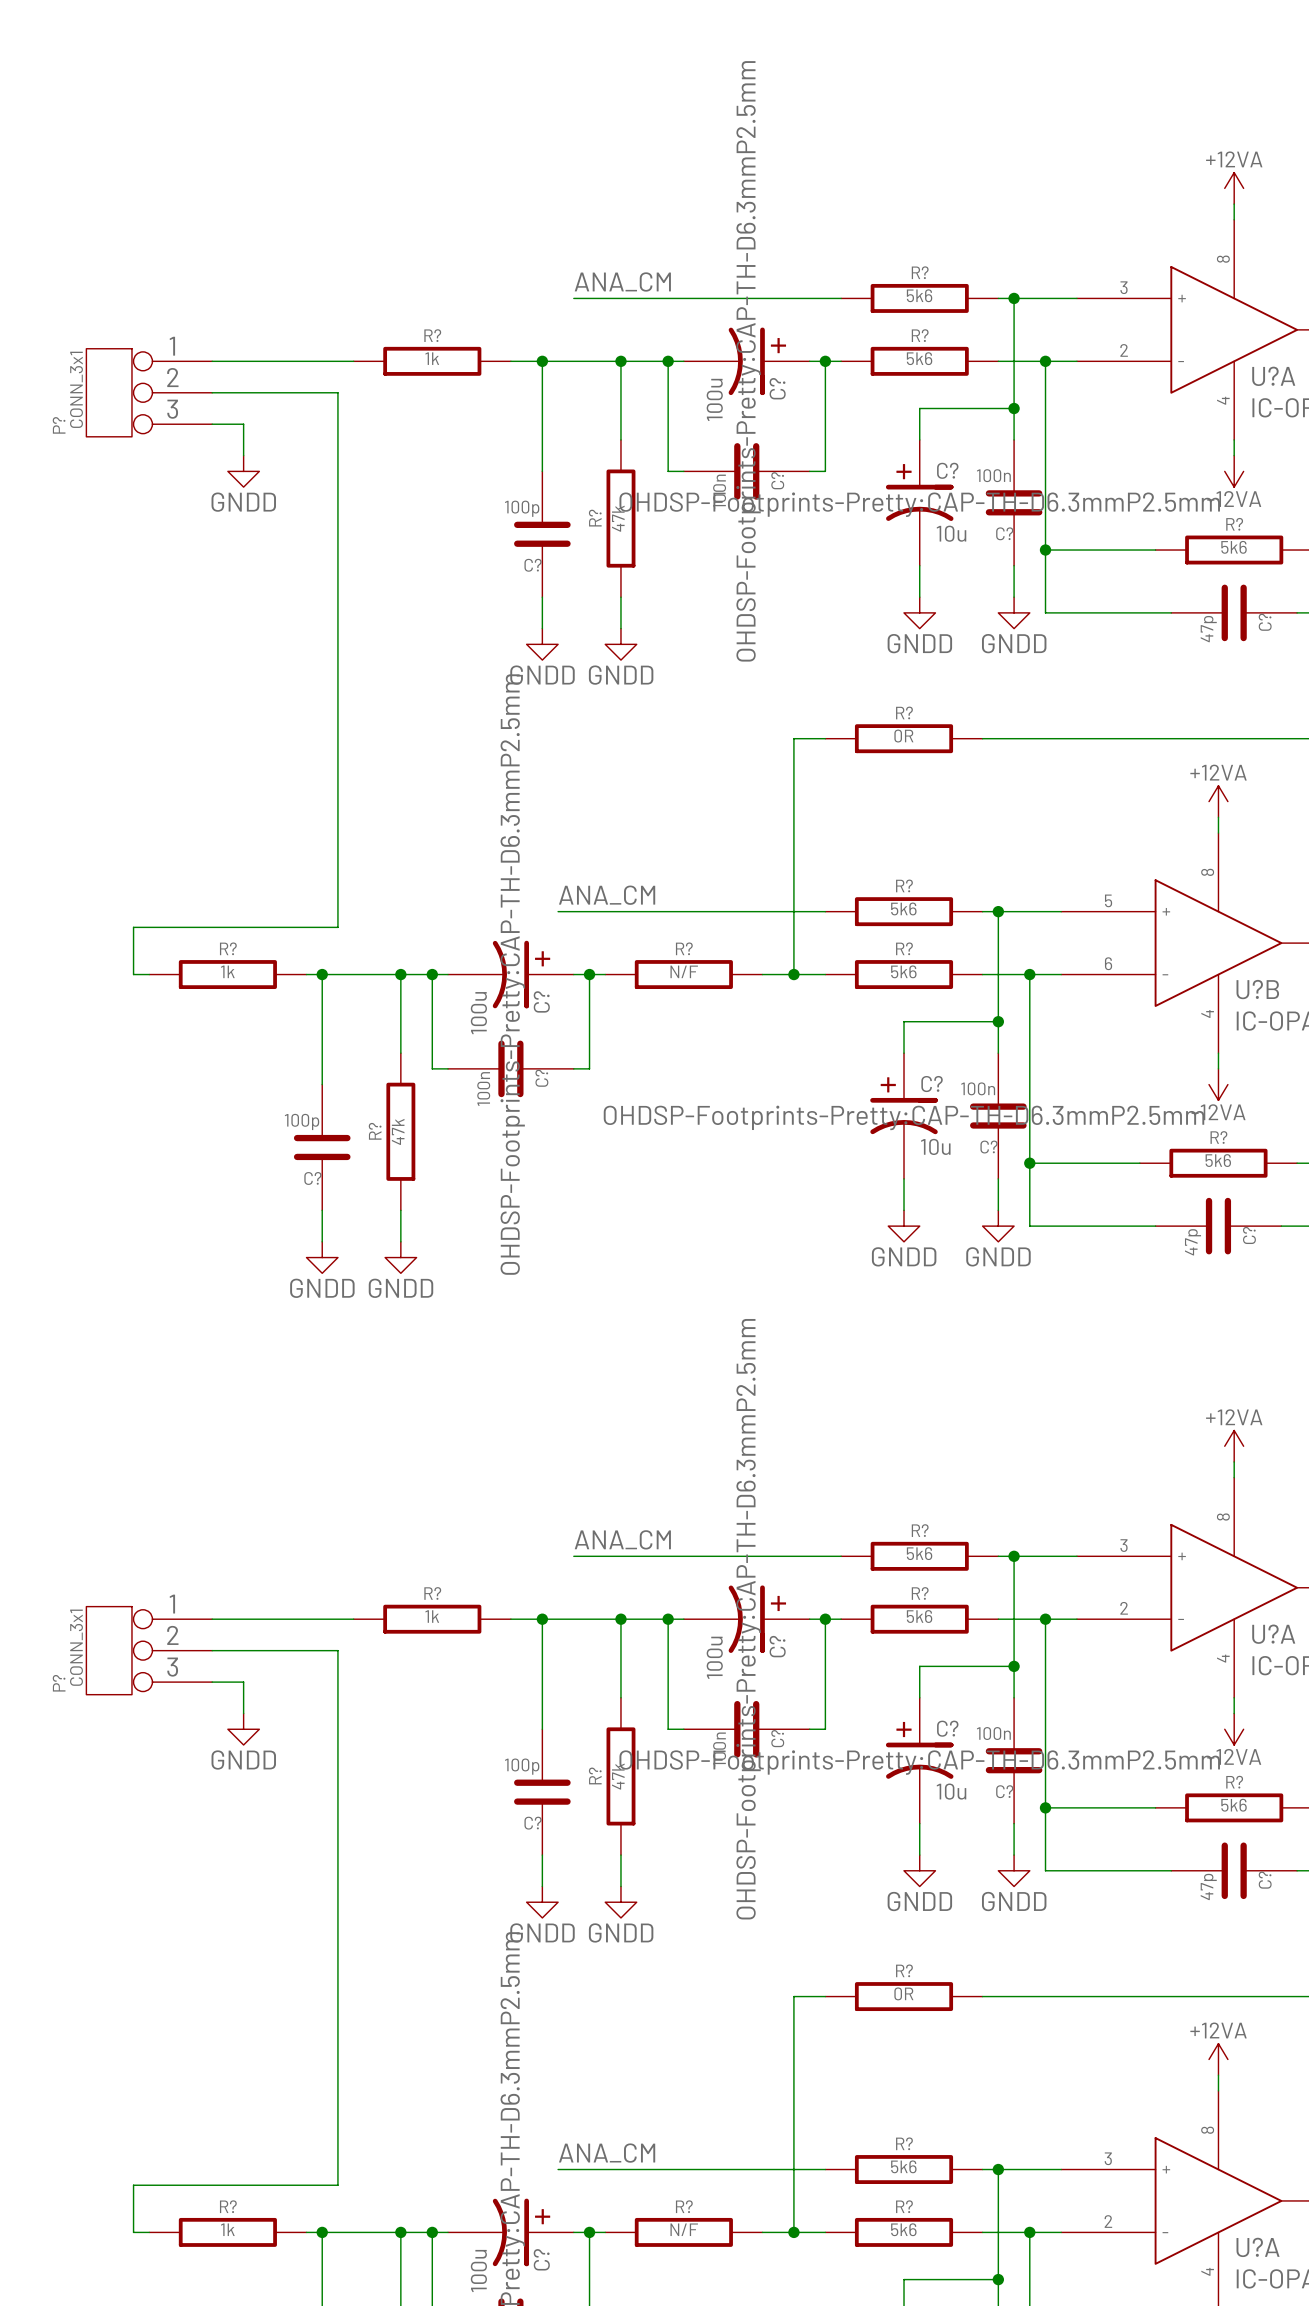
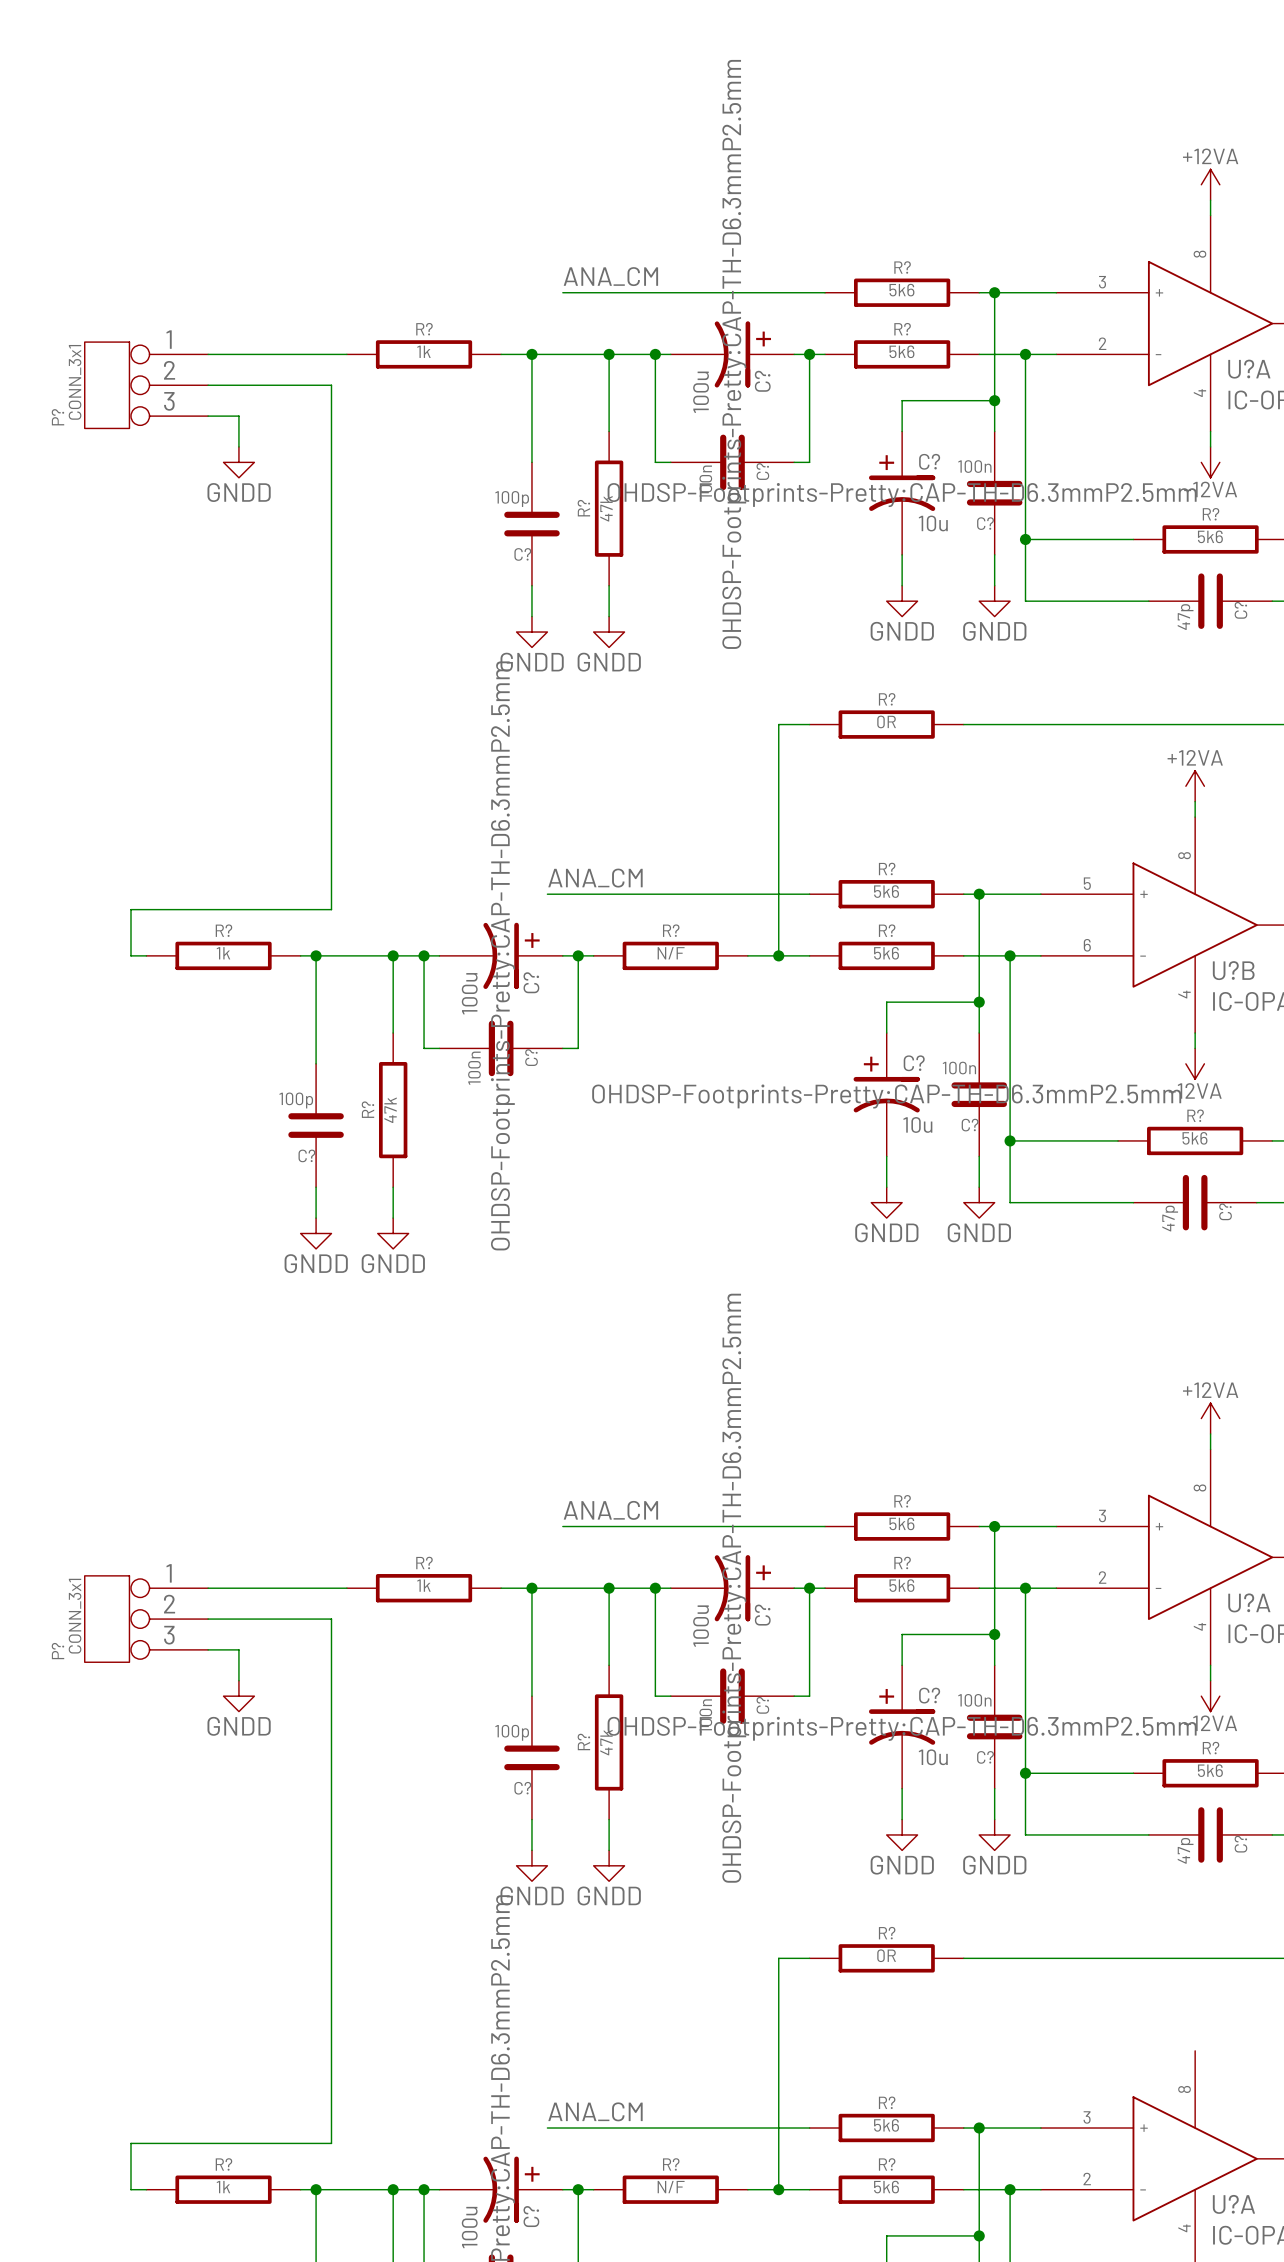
power symbol: +12VA (1218, 2059) -> none
wire: (1218, 2075) (1218, 2090) -> none

